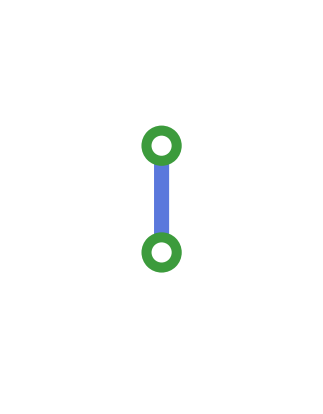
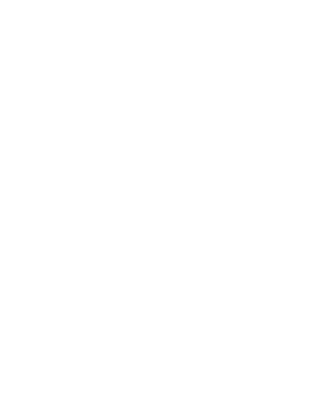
track: (161, 145) (161, 252) -> none
via: (161, 145) -> none
via: (161, 252) -> none

